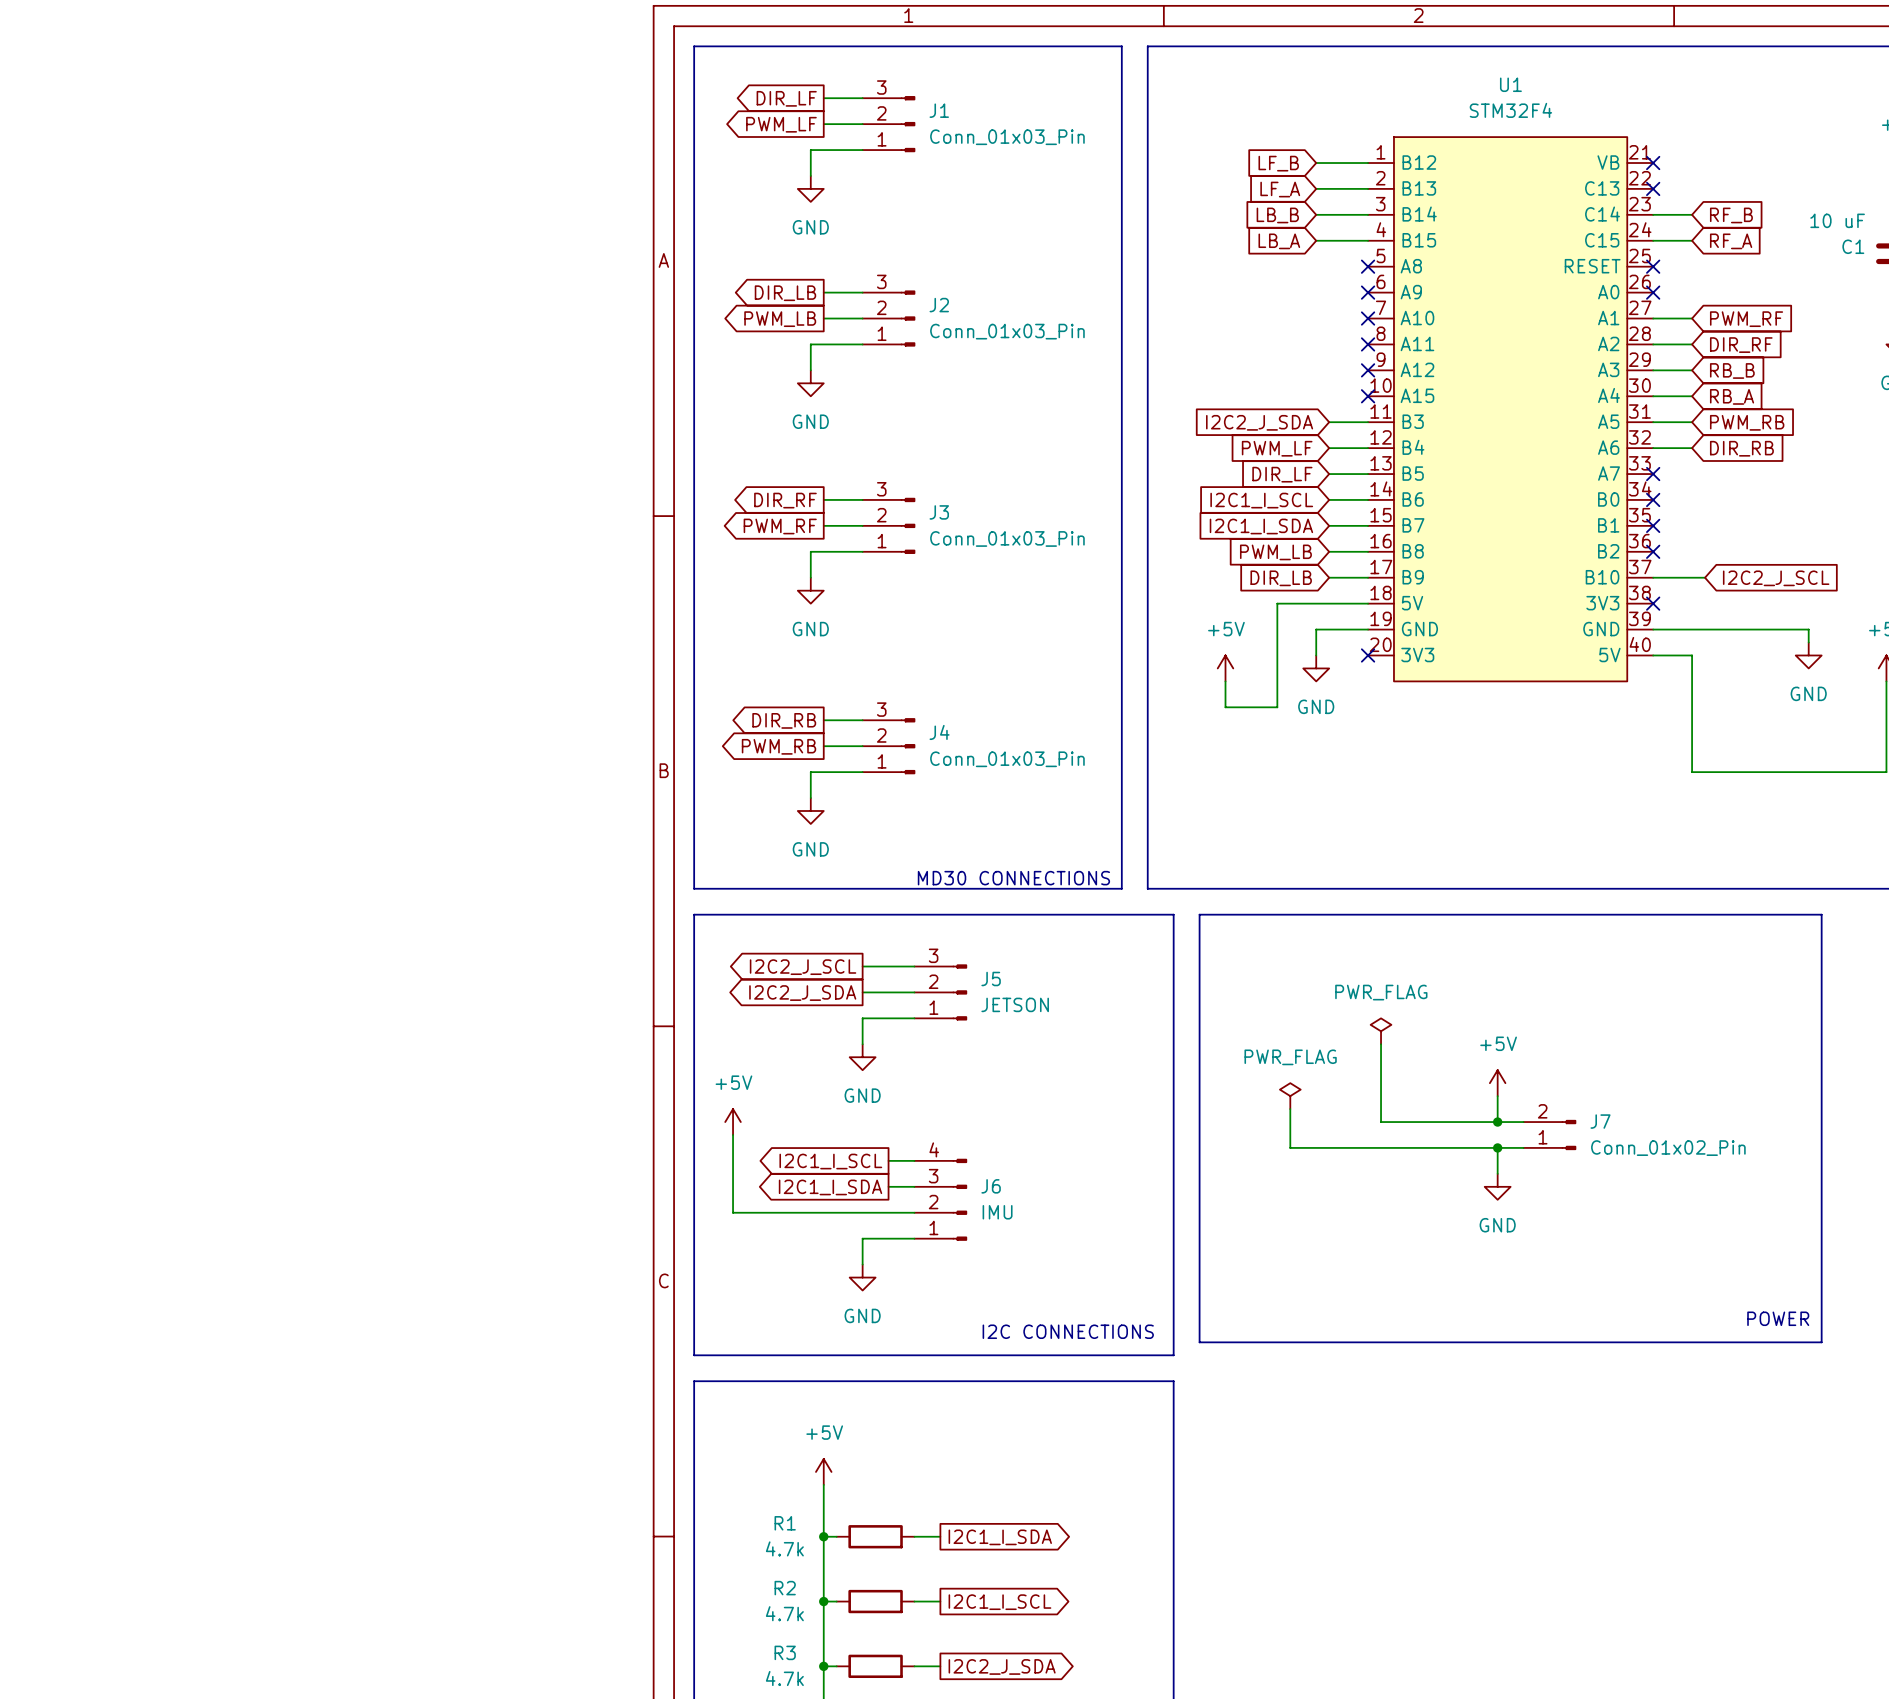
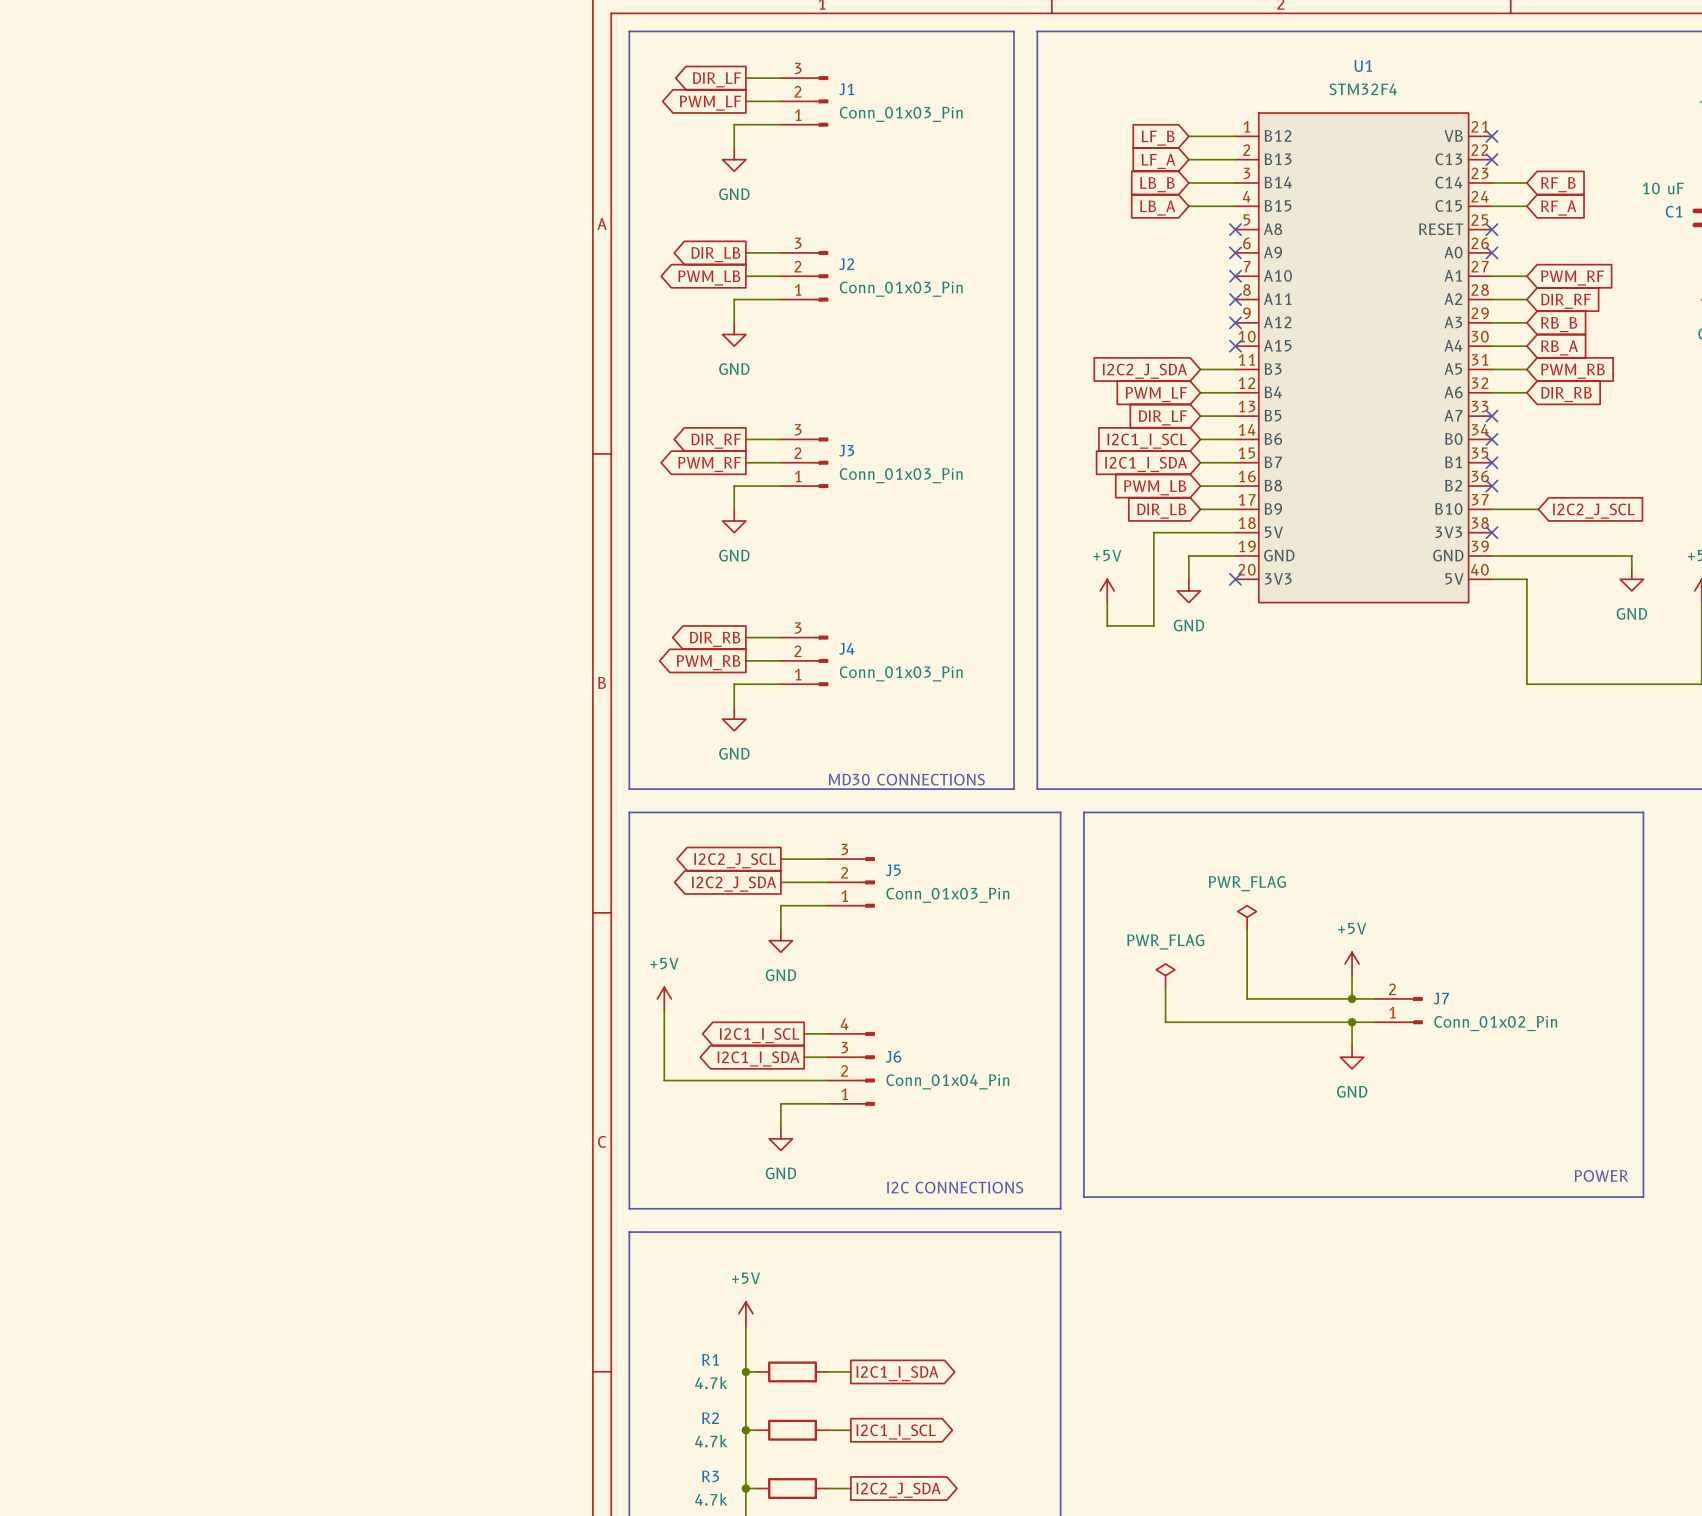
J5 value: JETSON (1015, 1004) -> Conn_01x03_Pin (947, 895)
J6 value: IMU (997, 1212) -> Conn_01x04_Pin (947, 1081)

